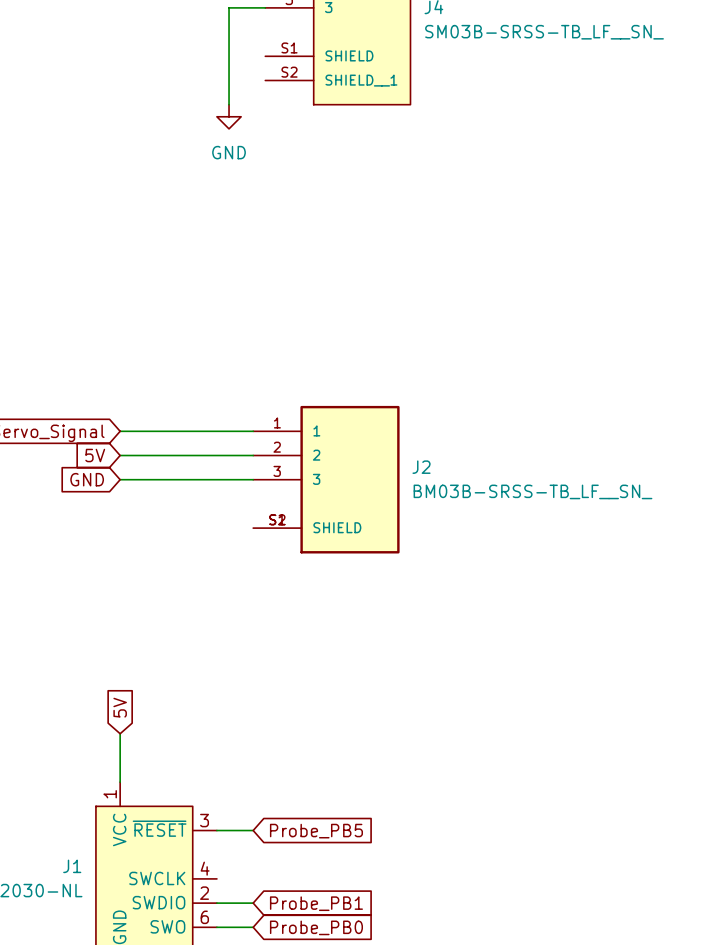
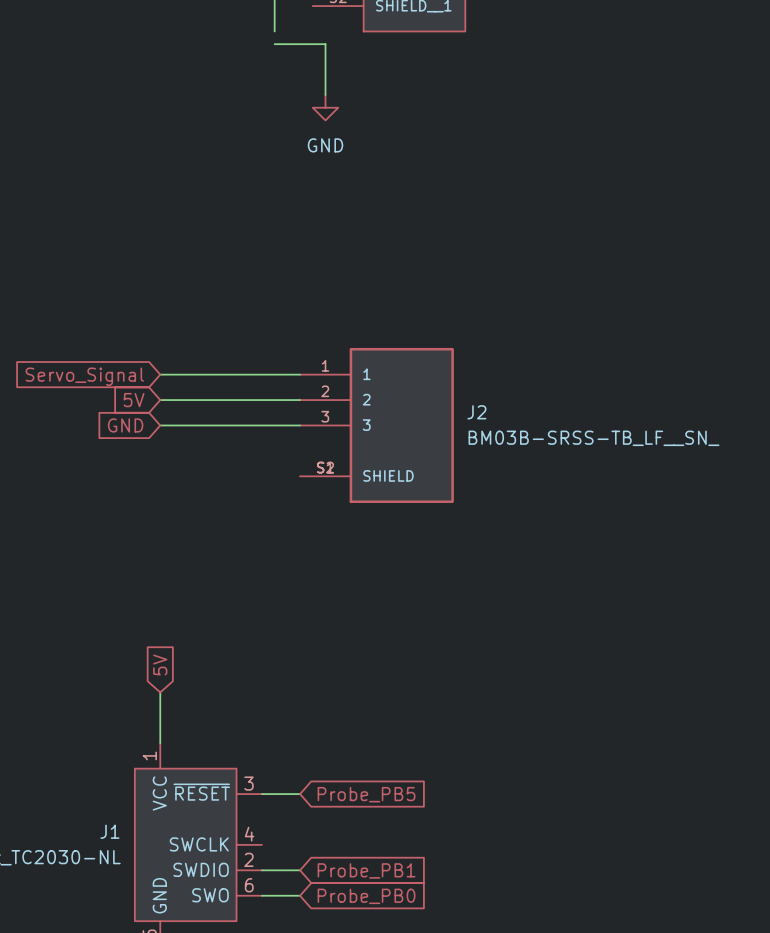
wire: none -> (274, 44) (325, 44) (325, 95)
power symbol position: GND (229, 116) -> GND (325, 107)

